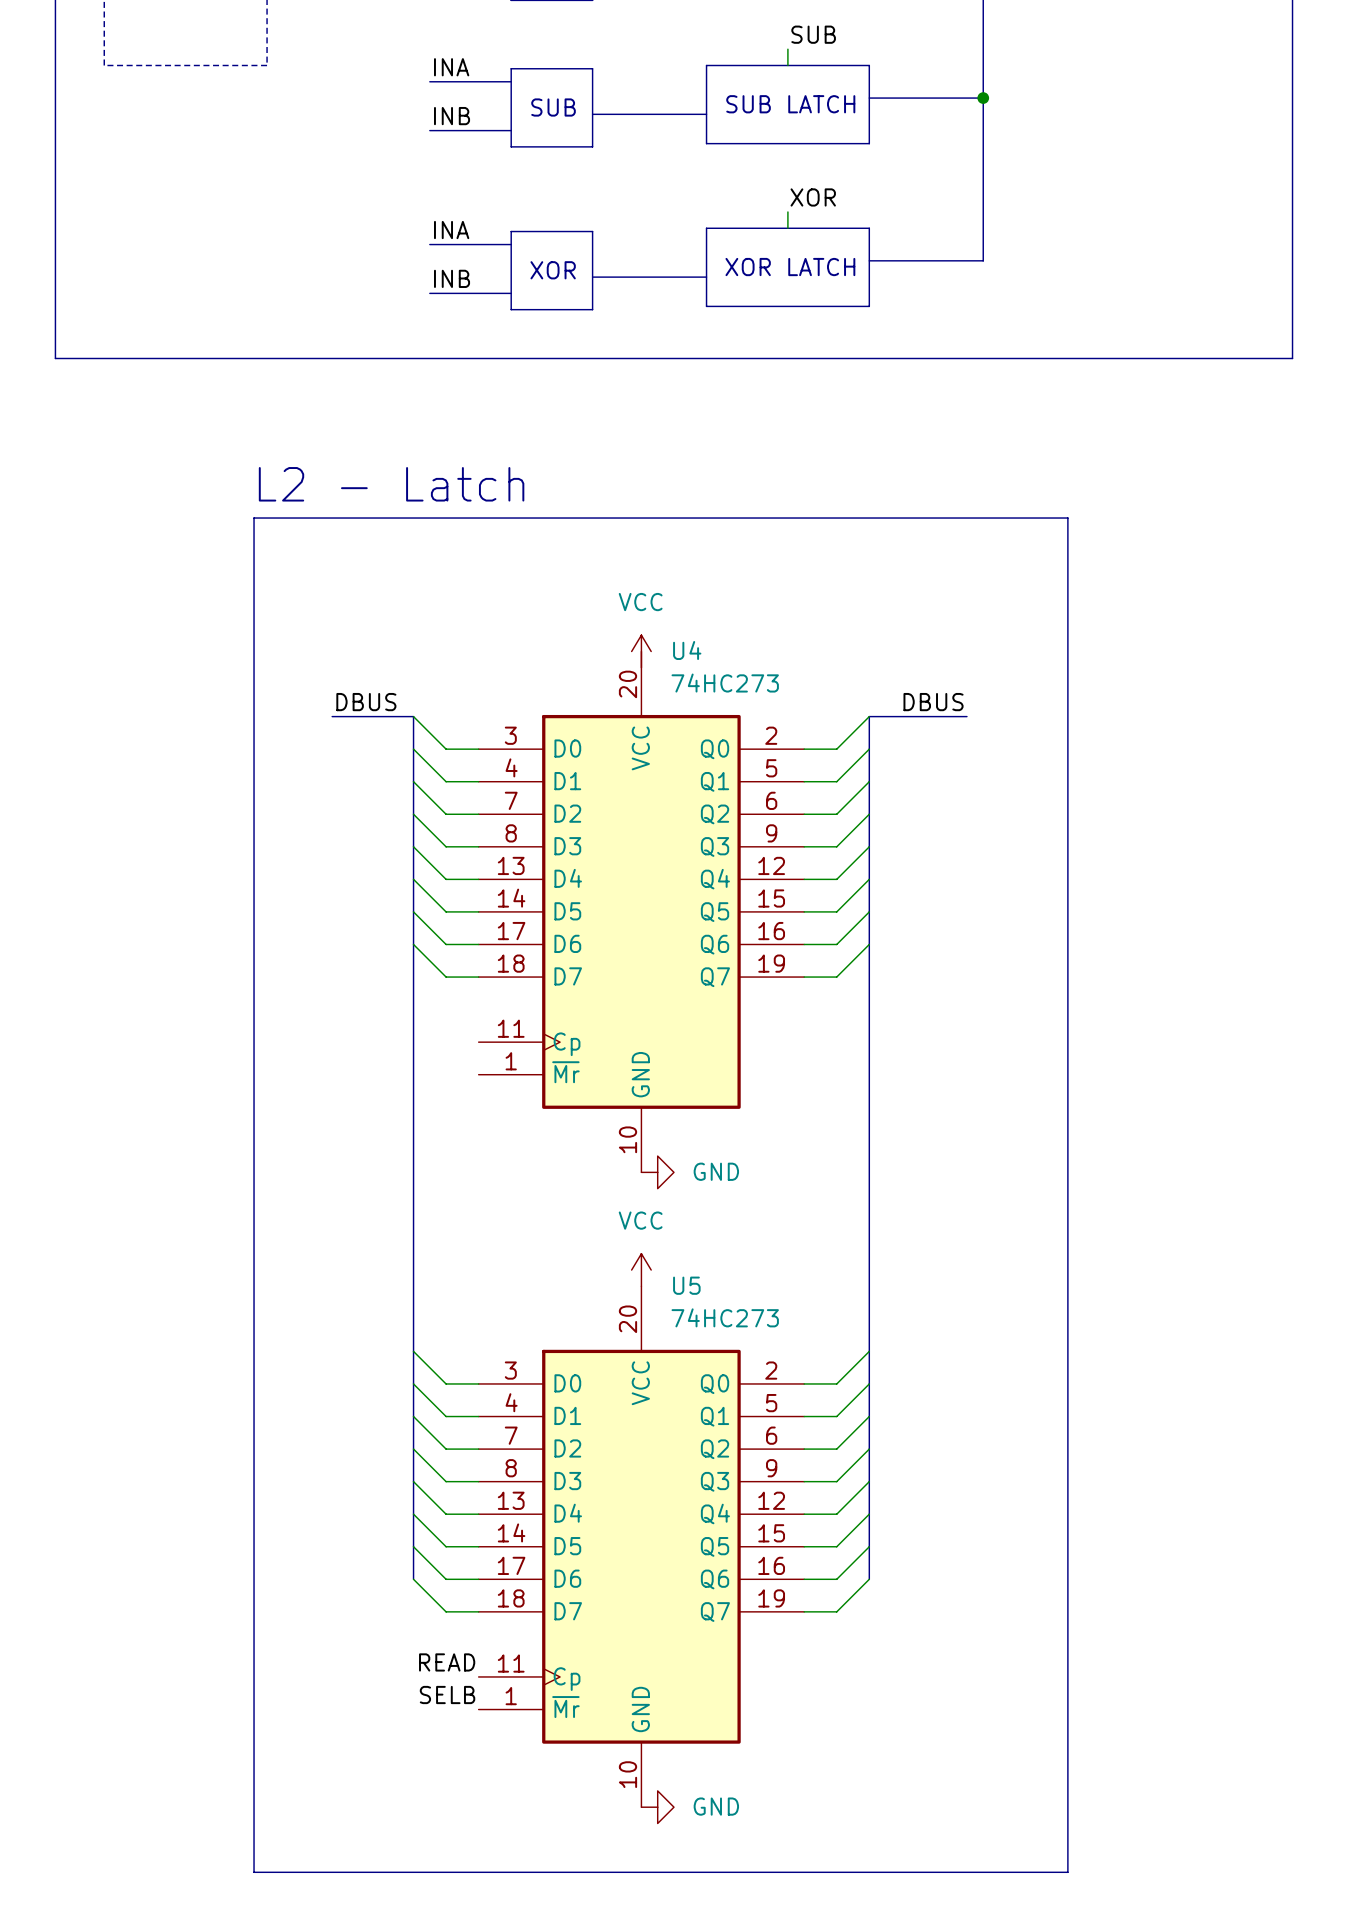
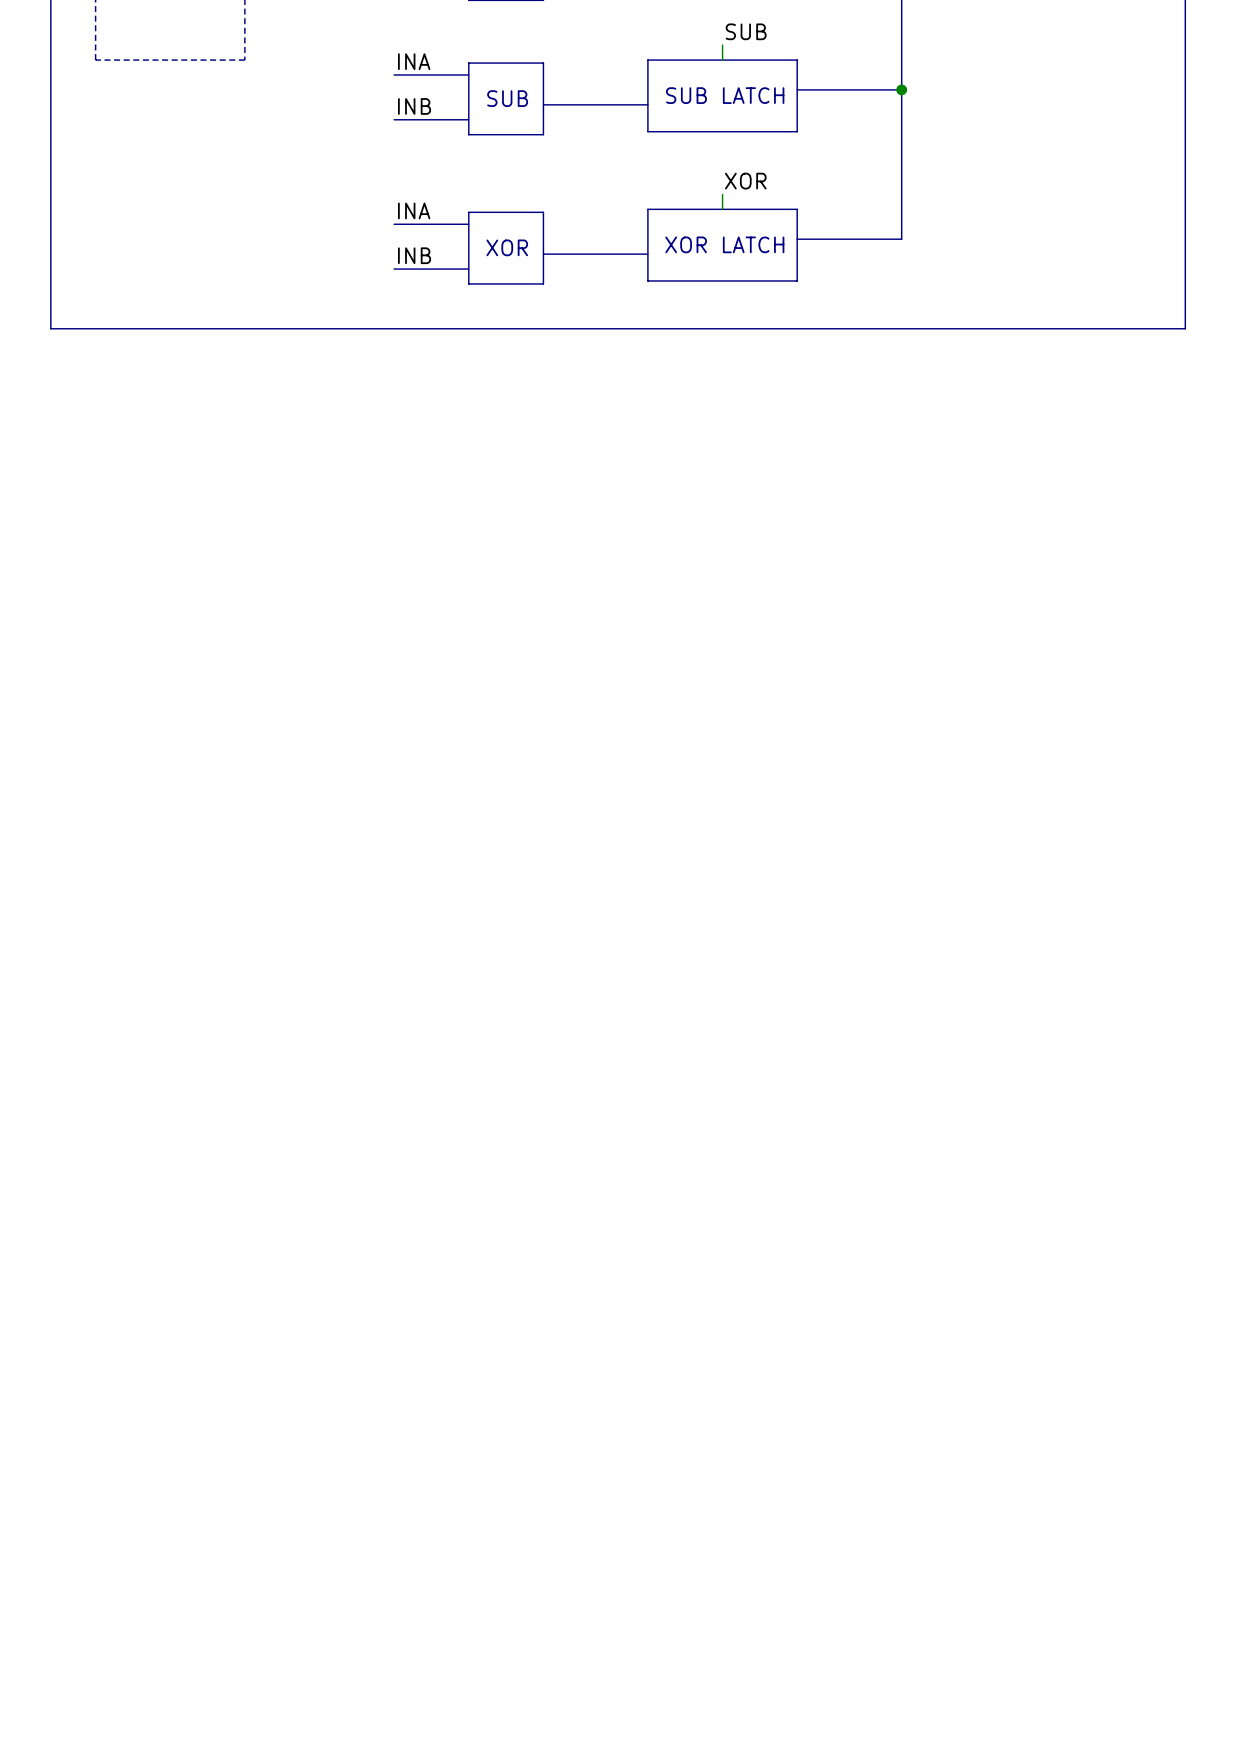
text: L2 - Latch (391, 484) -> none
line: (254, 518) (1067, 518) (1067, 1872) (254, 1872) (254, 518) -> none
power symbol: VCC (641, 651) -> none
label: DBUS (366, 702) -> none
label: DBUS (933, 702) -> none
bus: (332, 716) (413, 716) (413, 1579) -> none
wire: (413, 716) (446, 749) (478, 749) -> none
wire: (869, 716) (836, 749) (804, 749) -> none
bus: (966, 716) (869, 716) (869, 1579) -> none
wire: (413, 749) (446, 781) (478, 781) -> none
wire: (869, 749) (836, 781) (804, 781) -> none
wire: (413, 781) (446, 814) (478, 814) -> none
wire: (869, 781) (836, 814) (804, 814) -> none
wire: (413, 814) (446, 846) (478, 846) -> none
wire: (869, 814) (836, 846) (804, 846) -> none
wire: (413, 846) (446, 879) (478, 879) -> none
wire: (869, 846) (836, 879) (804, 879) -> none
wire: (413, 879) (446, 911) (478, 911) -> none
wire: (869, 879) (836, 911) (804, 911) -> none
wire: (413, 911) (446, 944) (478, 944) -> none
U4: 74HC273 (641, 911) -> none
wire: (869, 911) (836, 944) (804, 944) -> none
wire: (413, 944) (446, 977) (478, 977) -> none
wire: (869, 944) (836, 977) (804, 977) -> none
power symbol: GND (657, 1172) -> none
power symbol: VCC (641, 1270) -> none
wire: (413, 1351) (446, 1383) (478, 1383) -> none
wire: (869, 1351) (836, 1383) (804, 1383) -> none
wire: (413, 1383) (446, 1416) (478, 1416) -> none
wire: (869, 1383) (836, 1416) (804, 1416) -> none
wire: (413, 1416) (446, 1449) (478, 1449) -> none
wire: (869, 1416) (836, 1449) (804, 1449) -> none
wire: (413, 1449) (446, 1481) (478, 1481) -> none
wire: (869, 1449) (836, 1481) (804, 1481) -> none
wire: (413, 1481) (446, 1514) (478, 1514) -> none
wire: (869, 1481) (836, 1514) (804, 1514) -> none
wire: (413, 1514) (446, 1546) (478, 1546) -> none
wire: (869, 1514) (836, 1546) (804, 1546) -> none
wire: (413, 1546) (446, 1579) (478, 1579) -> none
U5: 74HC273 (641, 1546) -> none
wire: (869, 1546) (836, 1579) (804, 1579) -> none
wire: (413, 1579) (446, 1611) (478, 1611) -> none
wire: (869, 1579) (836, 1611) (804, 1611) -> none
label: READ (447, 1662) -> none
label: SELB (447, 1695) -> none
power symbol: GND (657, 1807) -> none

